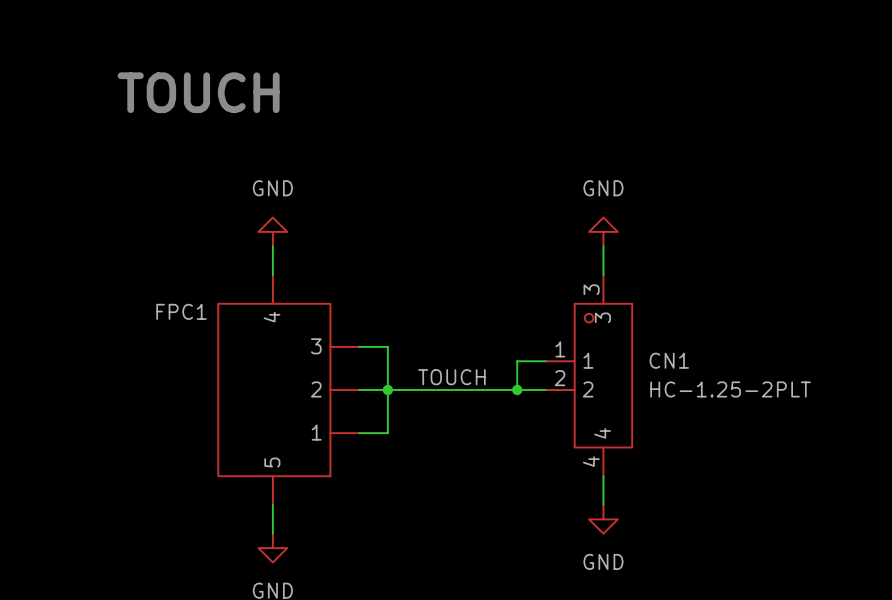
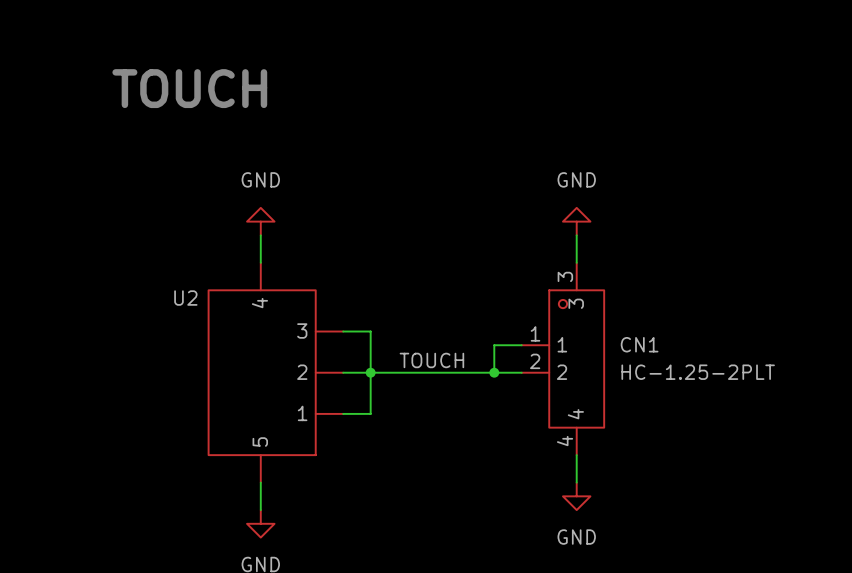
FPC1 name: FPC1 (181, 311) -> U2 (185, 298)

